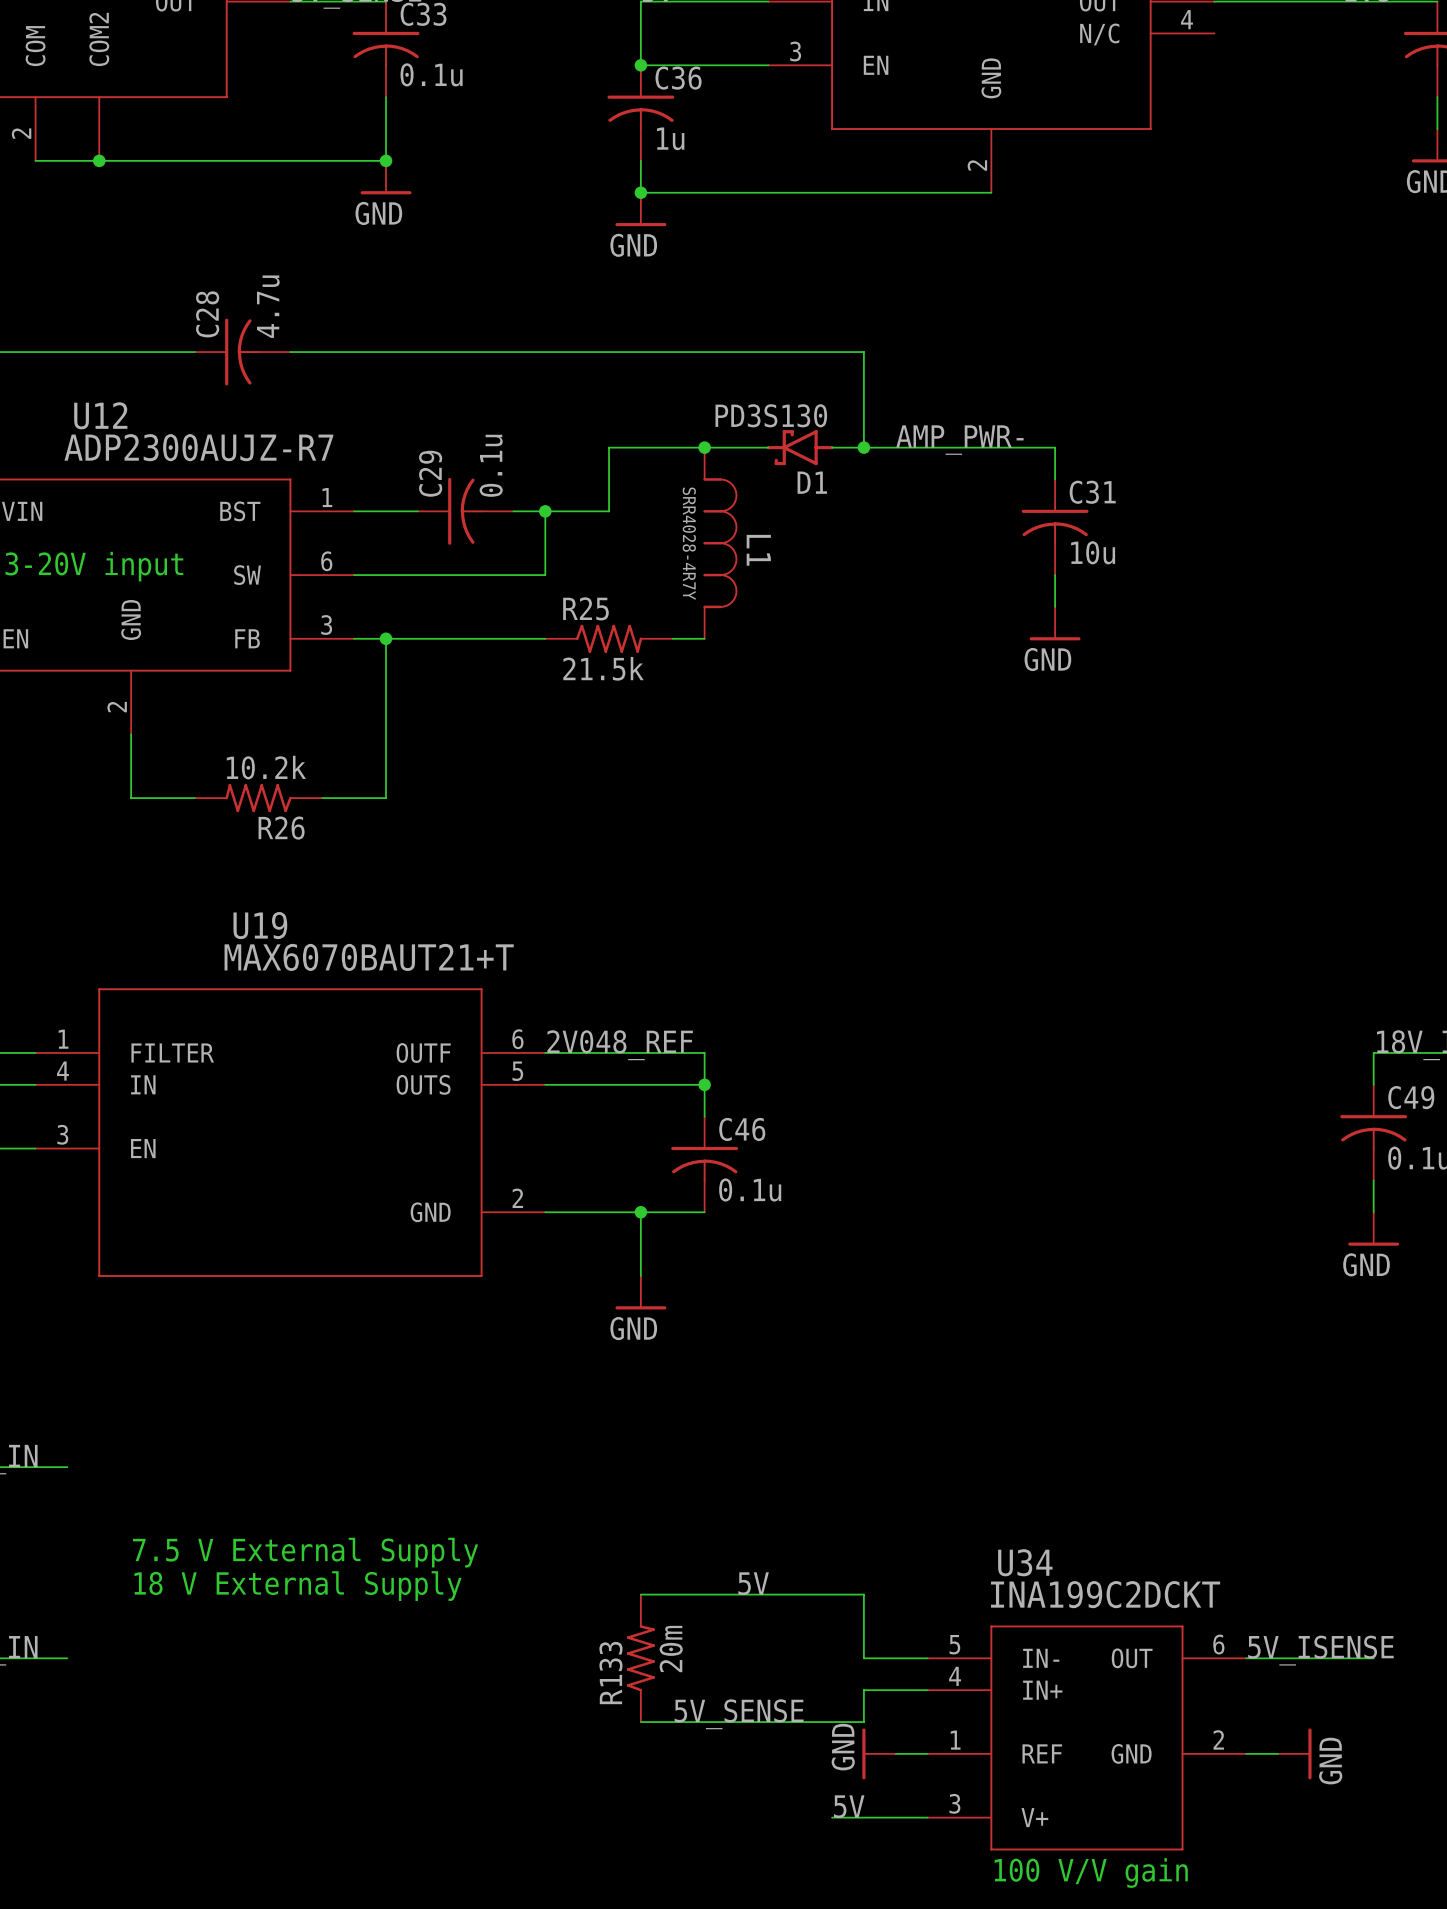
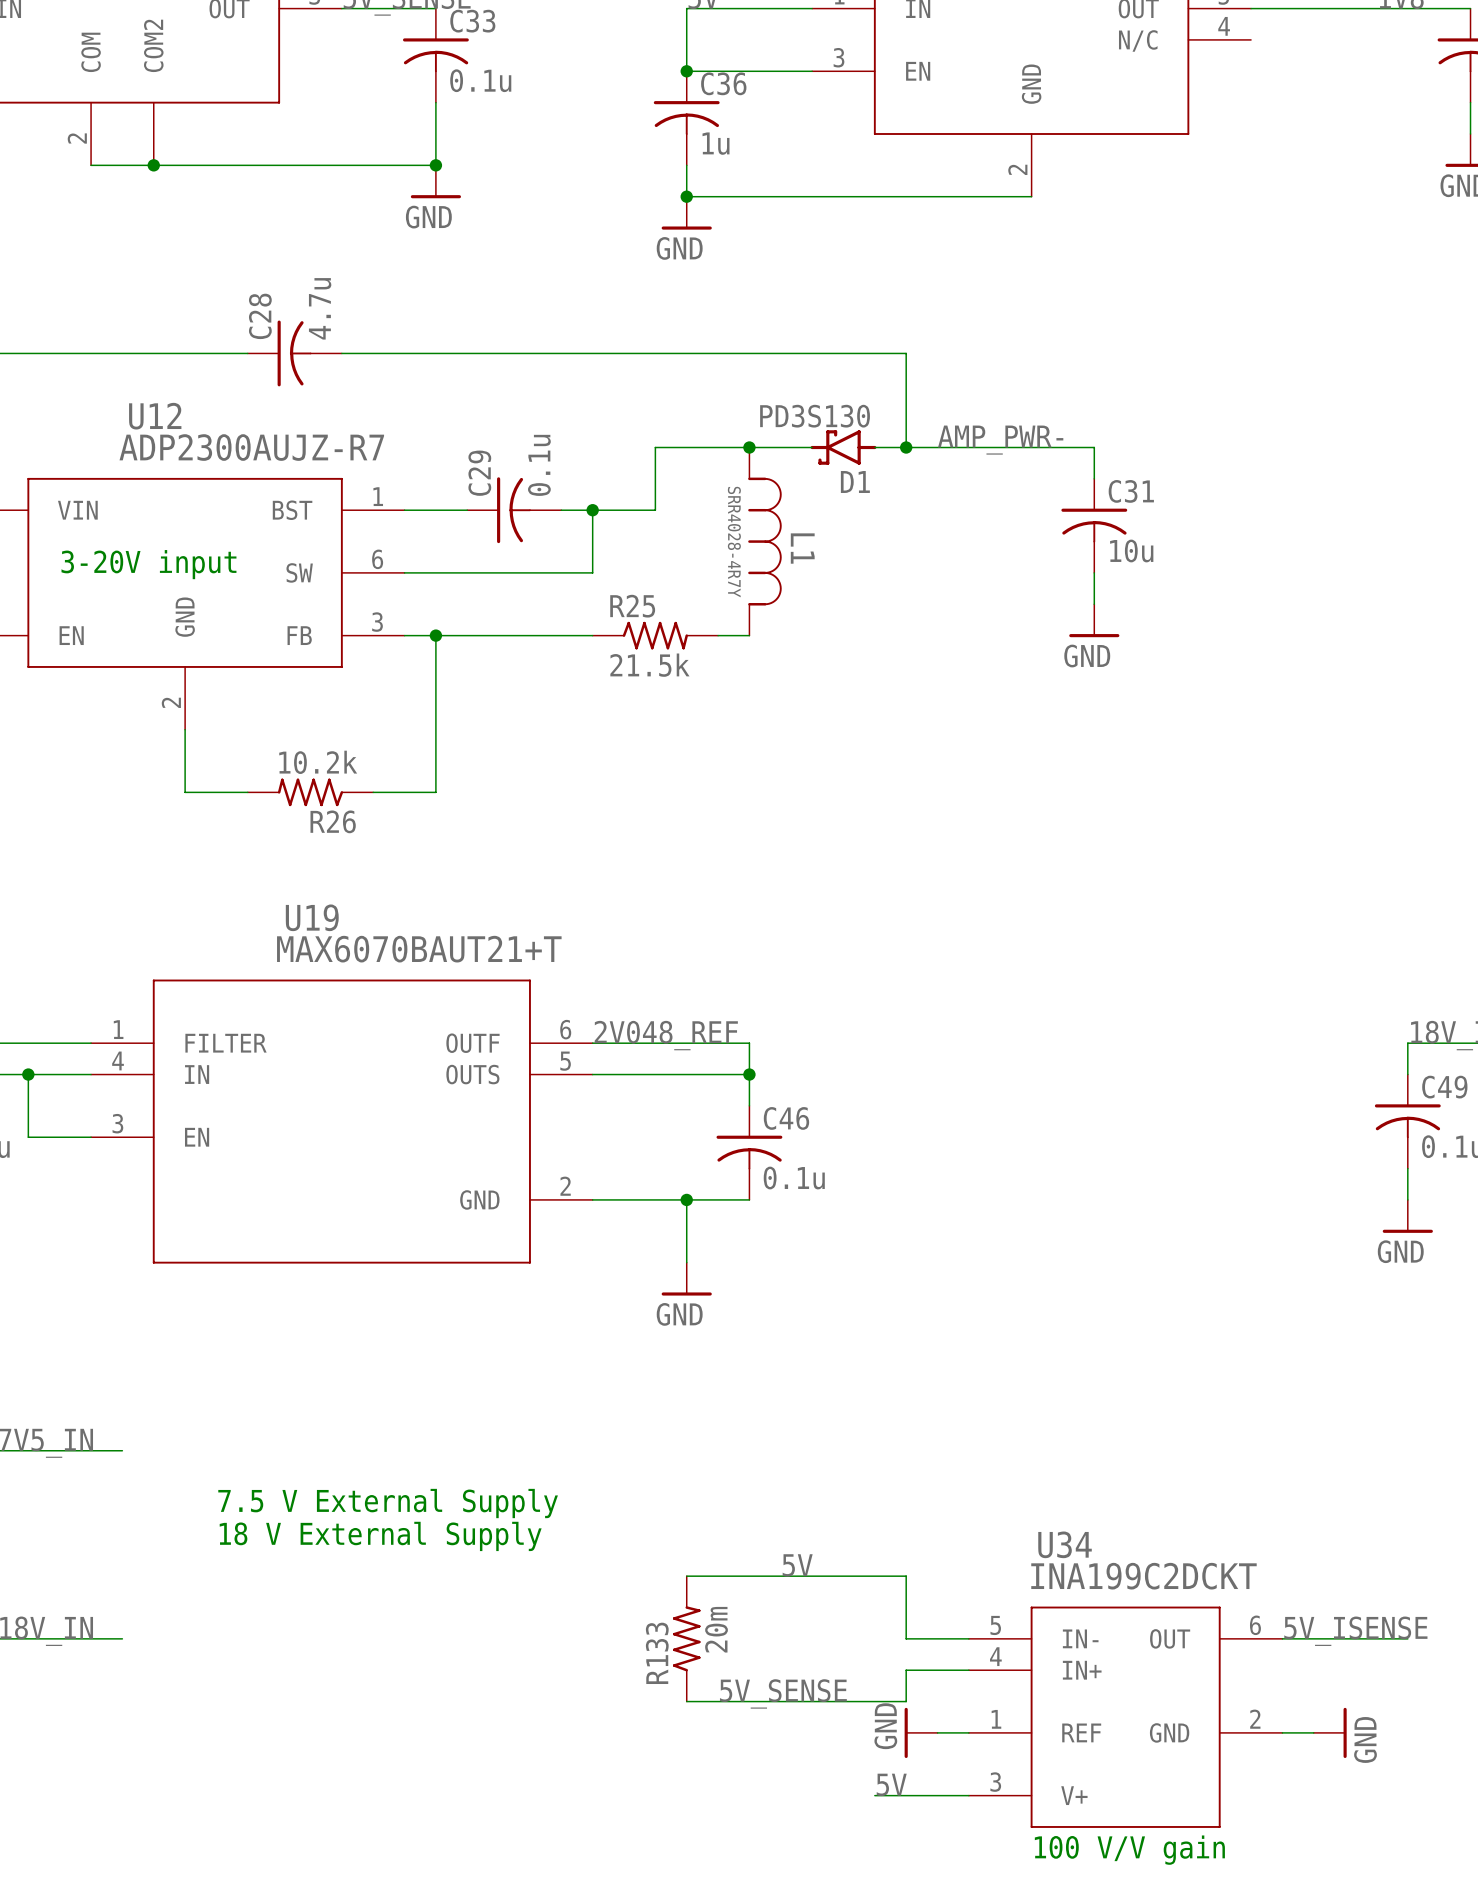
text position: 7.5 V External Supply (305, 1552) -> 7.5 V External Supply (388, 1503)
text position: 18 V External Supply (297, 1586) -> 18 V External Supply (380, 1536)

